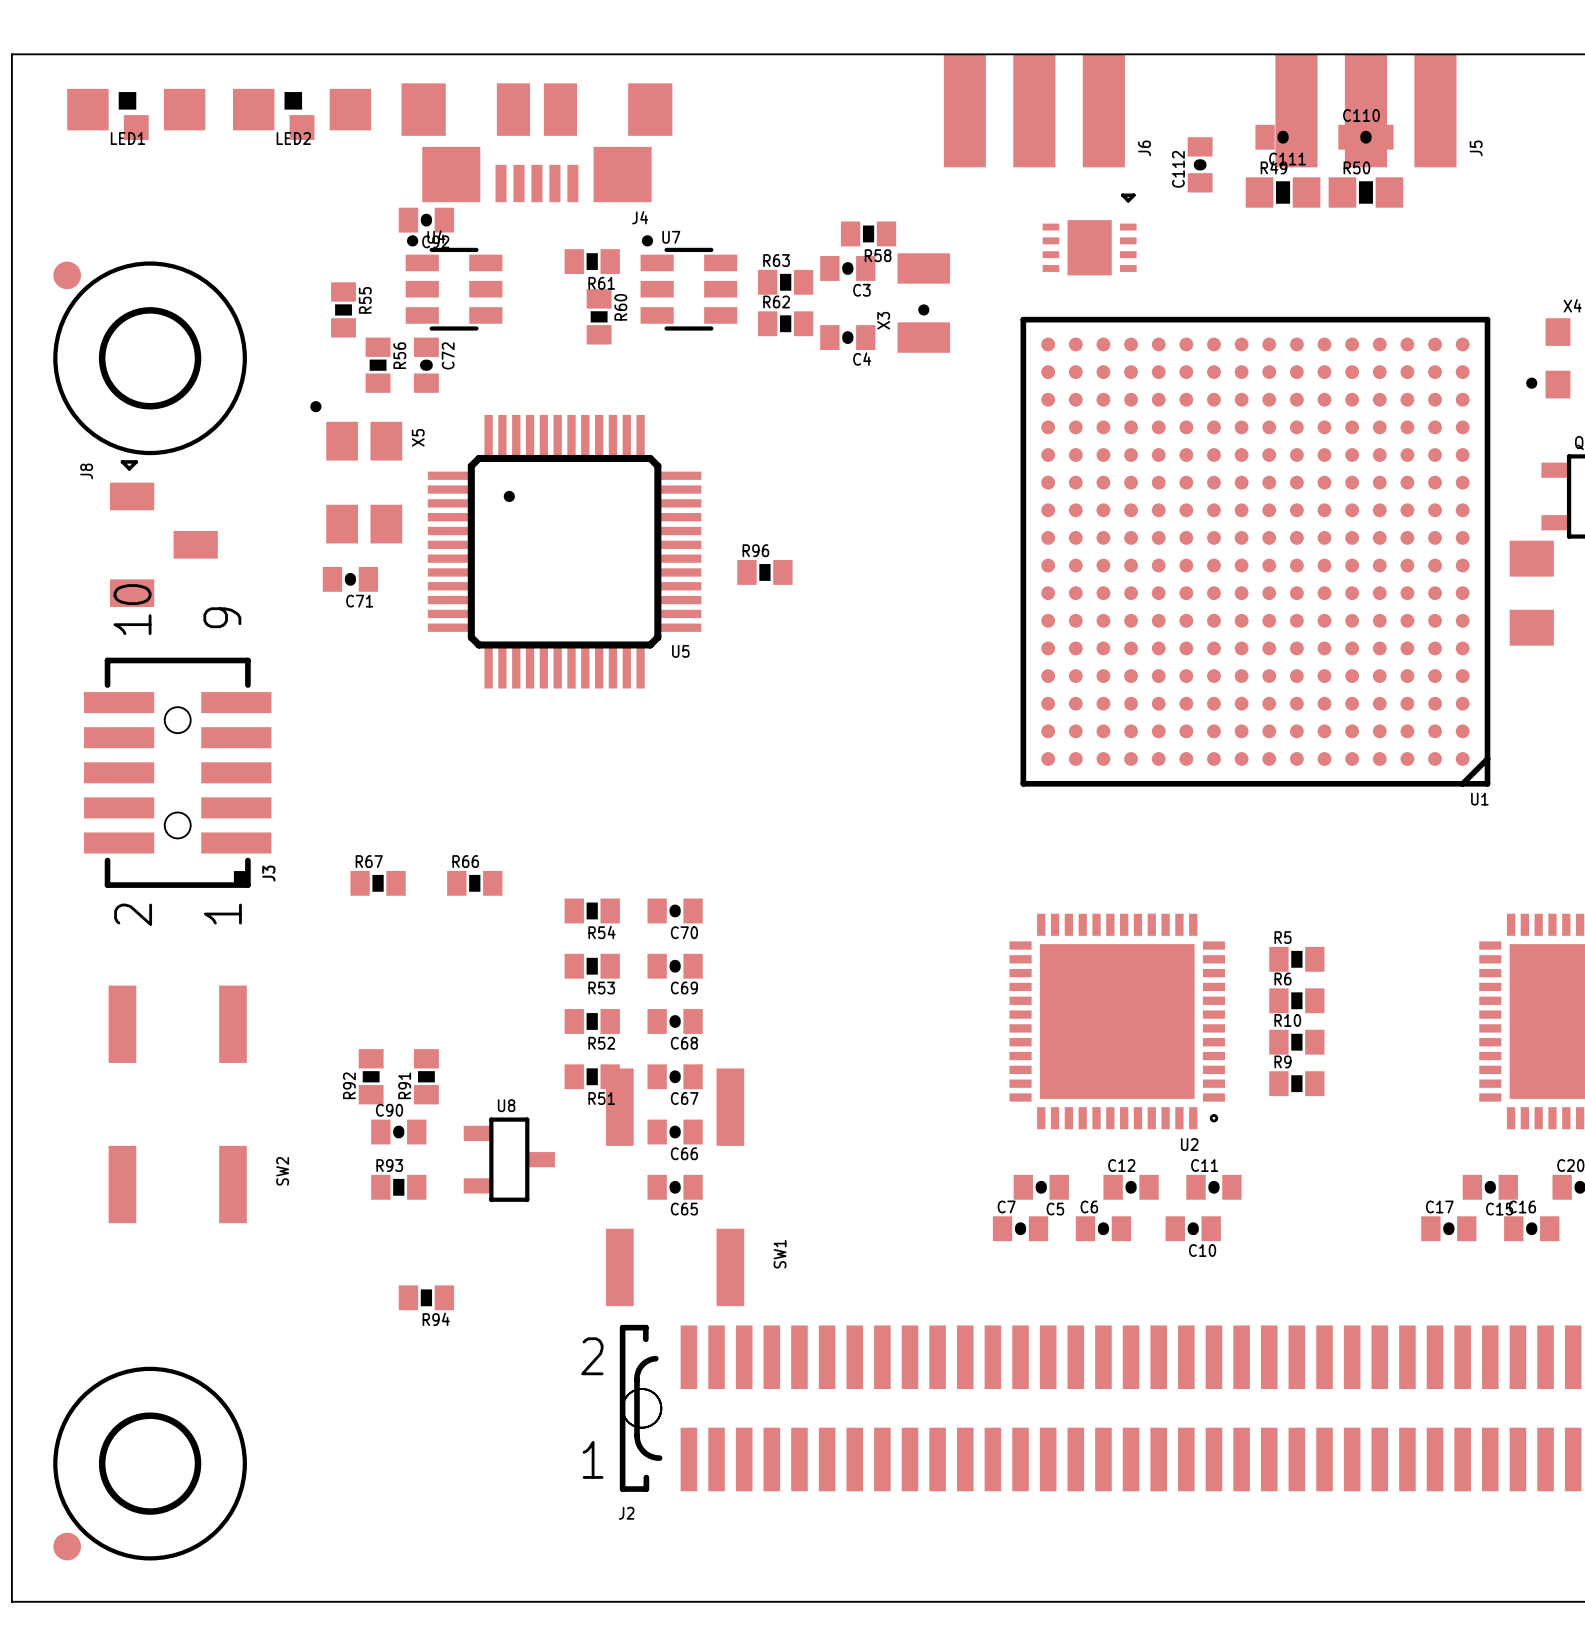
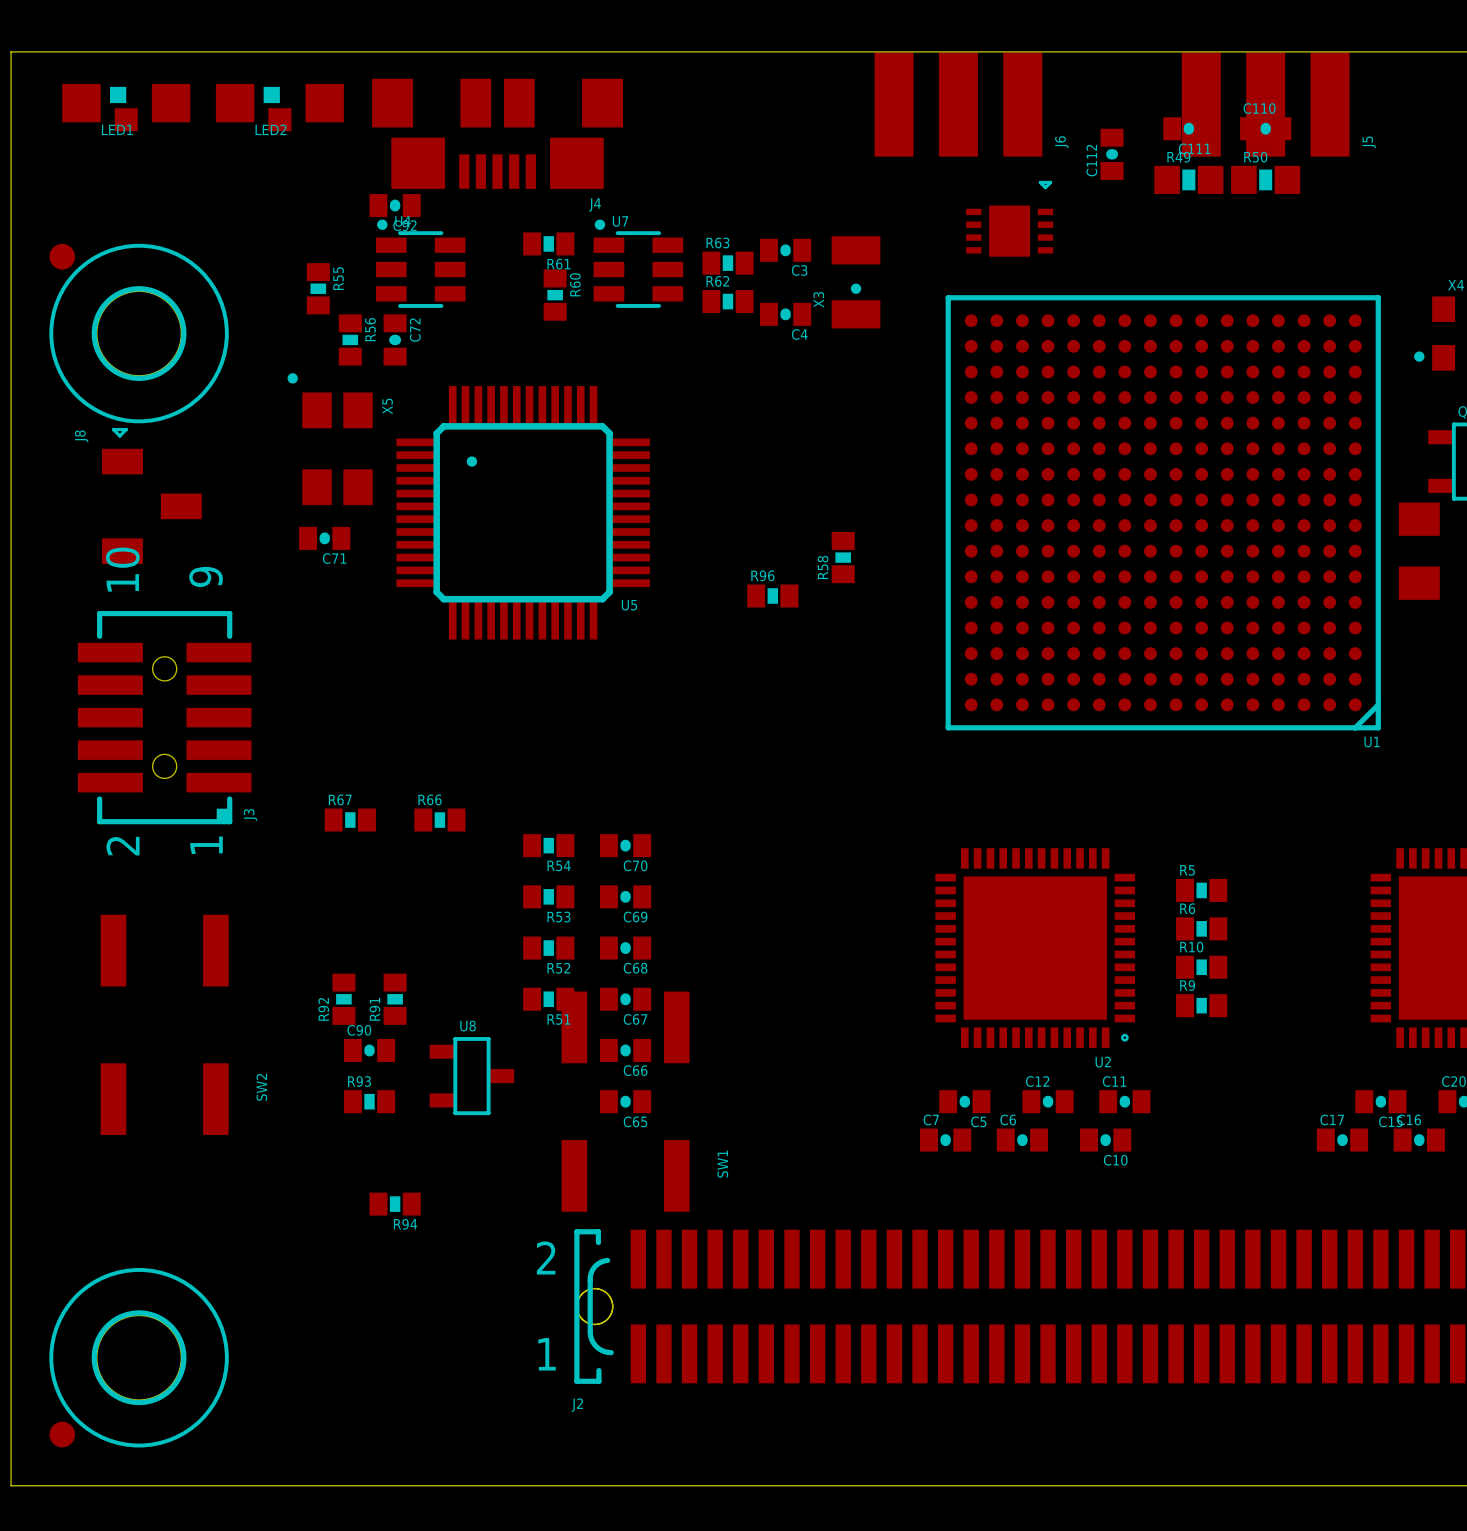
R58 rotation: 0° (868, 233) -> 90° clockwise (843, 557)
R58 position: (868, 233) -> (843, 557)
R96 position: (764, 572) -> (772, 596)

